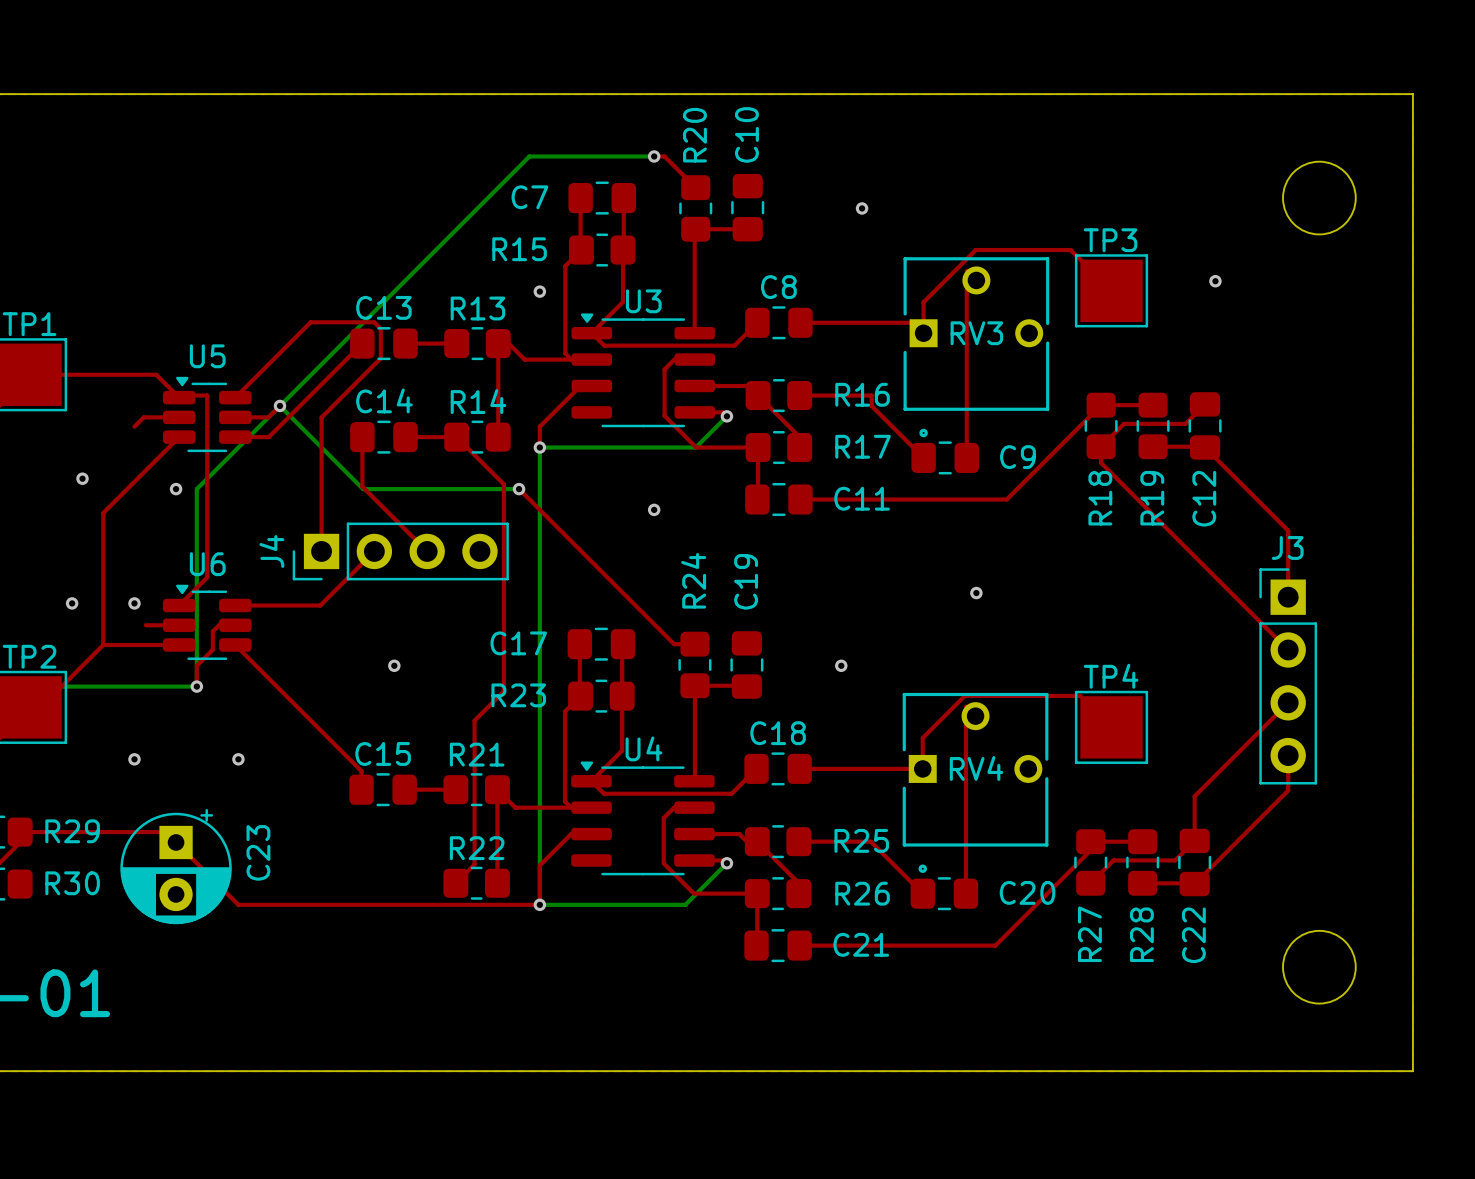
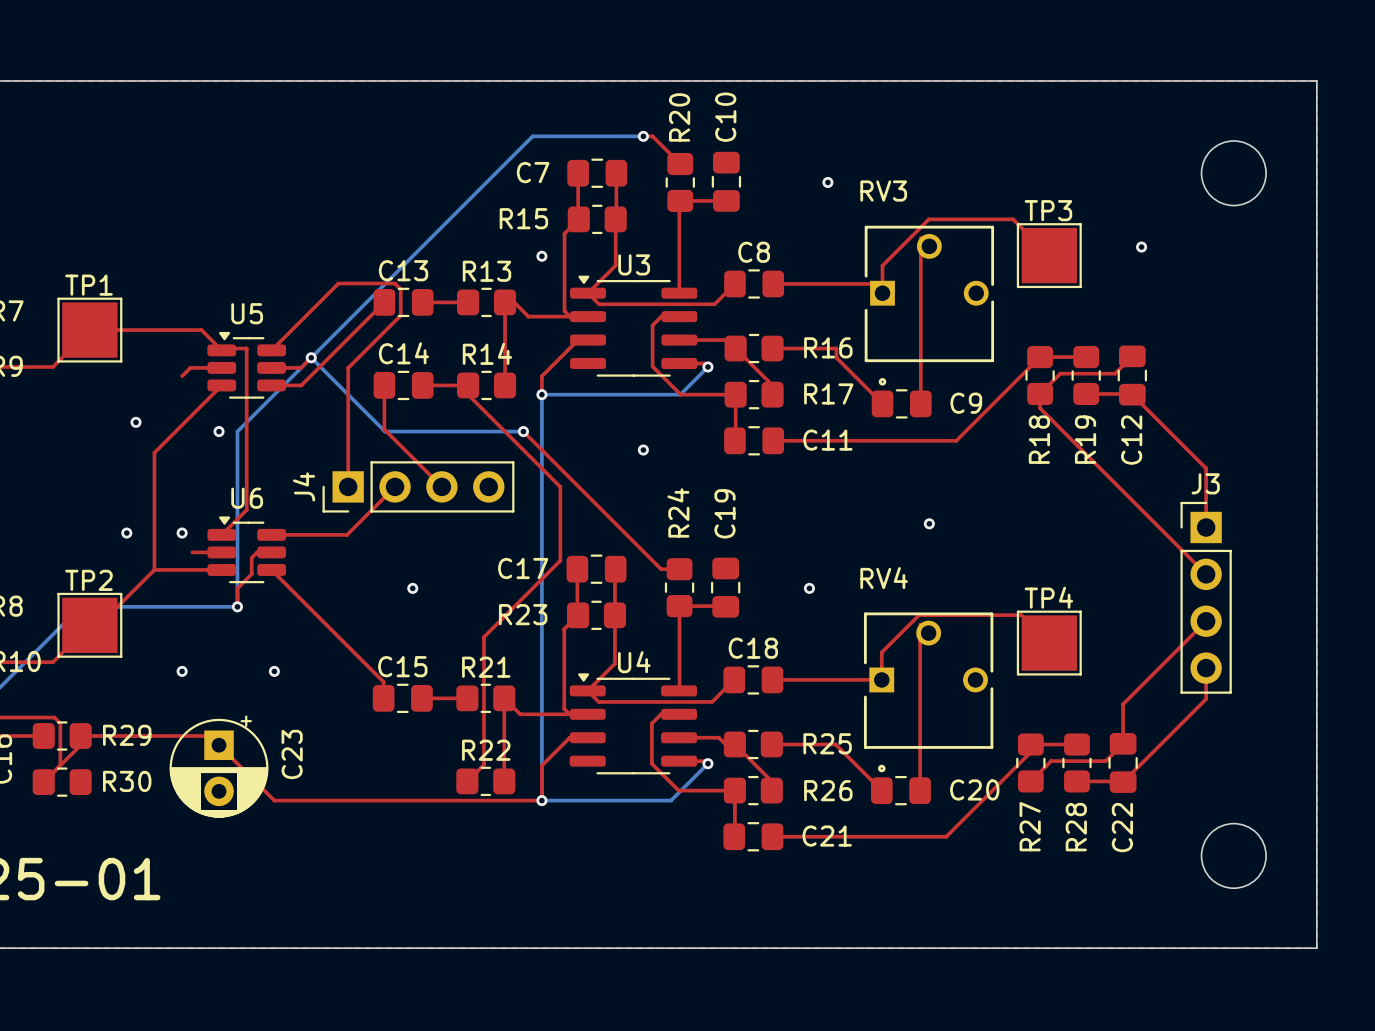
RV3 name position: RV3 (976, 333) -> RV3 (883, 191)
top track: (456, 437) (503, 484) (503, 691) -> (468, 385) (468, 394) (560, 486) (560, 560) (509, 611)
RV4 name position: RV4 (976, 768) -> RV4 (884, 578)

